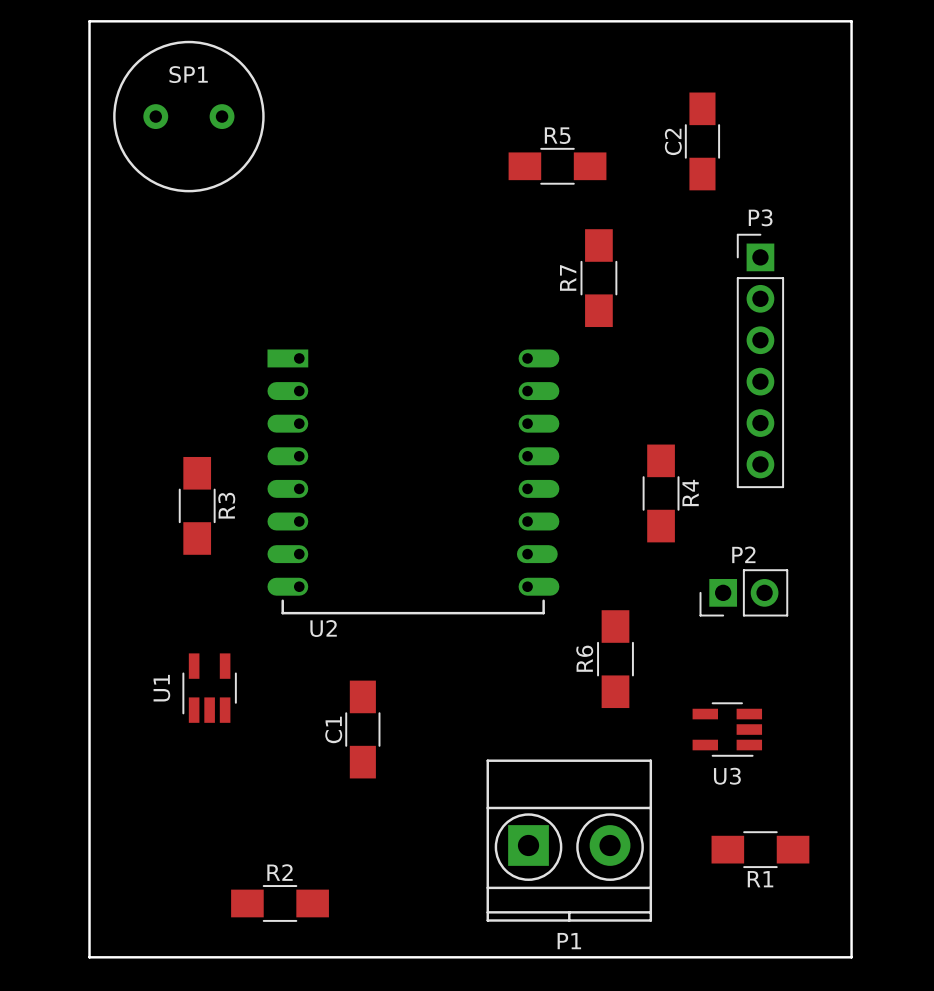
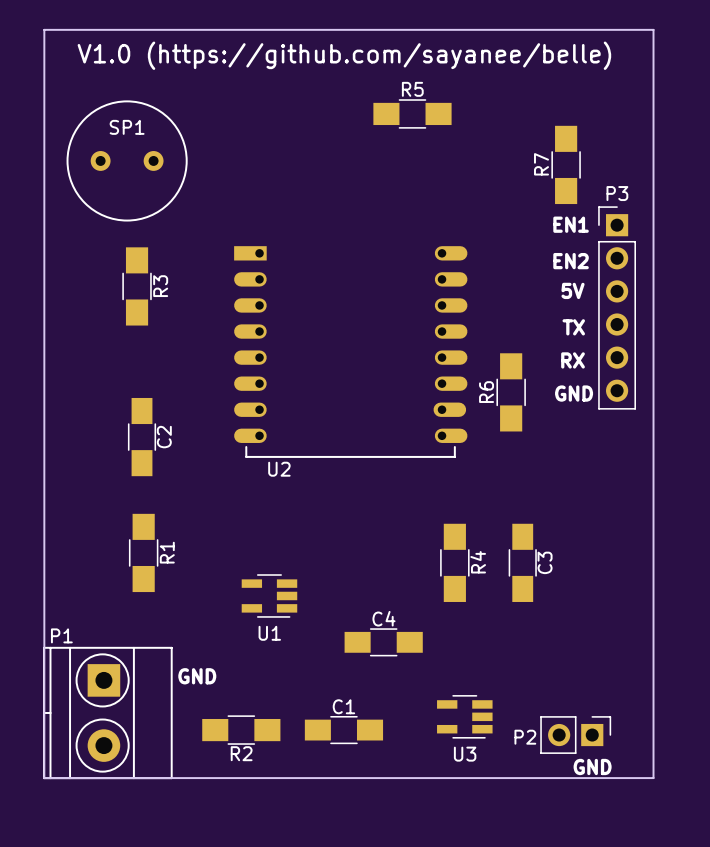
text: none -> V1.0 (https://github.com/sayanee/belle) (344, 55)
SP1 position: (188, 116) -> (127, 160)
C2 name position: C2 (673, 141) -> C2 (164, 437)
C2 position: (702, 141) -> (142, 437)
R5 position: (557, 166) -> (412, 113)
text: none -> EN1 (571, 224)
R7 position: (598, 278) -> (566, 164)
text: none -> EN2 (571, 261)
text: none -> 5V (573, 290)
P3 position: (760, 360) -> (617, 307)
text: none -> TX (573, 327)
text: none -> RX (573, 360)
text: none -> GND (574, 393)
U2 position: (413, 481) -> (350, 352)
R4 position: (661, 493) -> (454, 562)
R3 position: (197, 505) -> (137, 286)
P2 name position: P2 (743, 554) -> P2 (525, 737)
P2 rotation: 0° (743, 592) -> 180° (575, 735)
P2 position: (743, 592) -> (575, 735)
R6 position: (615, 659) -> (511, 392)
U1 rotation: 0° (209, 688) -> 90° counterclockwise (269, 595)
U1 position: (209, 688) -> (269, 595)
C3: none -> (522, 562)
C1 rotation: 0° (362, 729) -> 90° clockwise (343, 730)
C1 position: (362, 729) -> (343, 730)
U3 position: (727, 729) -> (464, 716)
C4: none -> (383, 642)
text: none -> GND (197, 676)
P1 rotation: 0° (569, 840) -> 90° clockwise (107, 712)
P1 position: (569, 840) -> (107, 712)
R1 rotation: 0° (760, 849) -> 90° clockwise (143, 552)
R1 position: (760, 849) -> (143, 552)
R2 name position: R2 (280, 872) -> R2 (241, 753)
R1 name position: R1 (760, 879) -> R1 (167, 552)
R2 position: (280, 903) -> (241, 730)
P1 name position: P1 (569, 941) -> P1 (61, 635)
text: none -> GND (592, 766)

